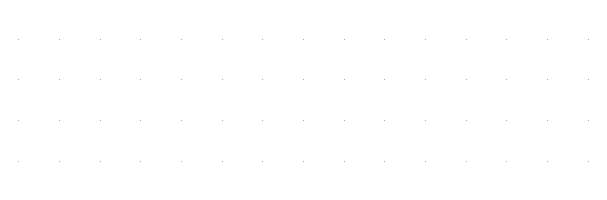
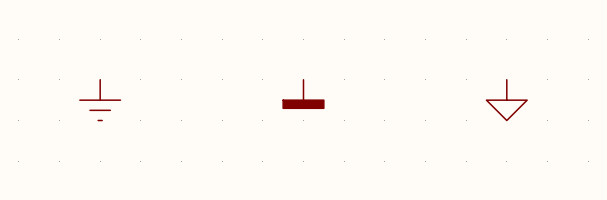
power symbol: none -> (303, 94)
power symbol: none -> (100, 100)
power symbol: none -> (506, 100)

